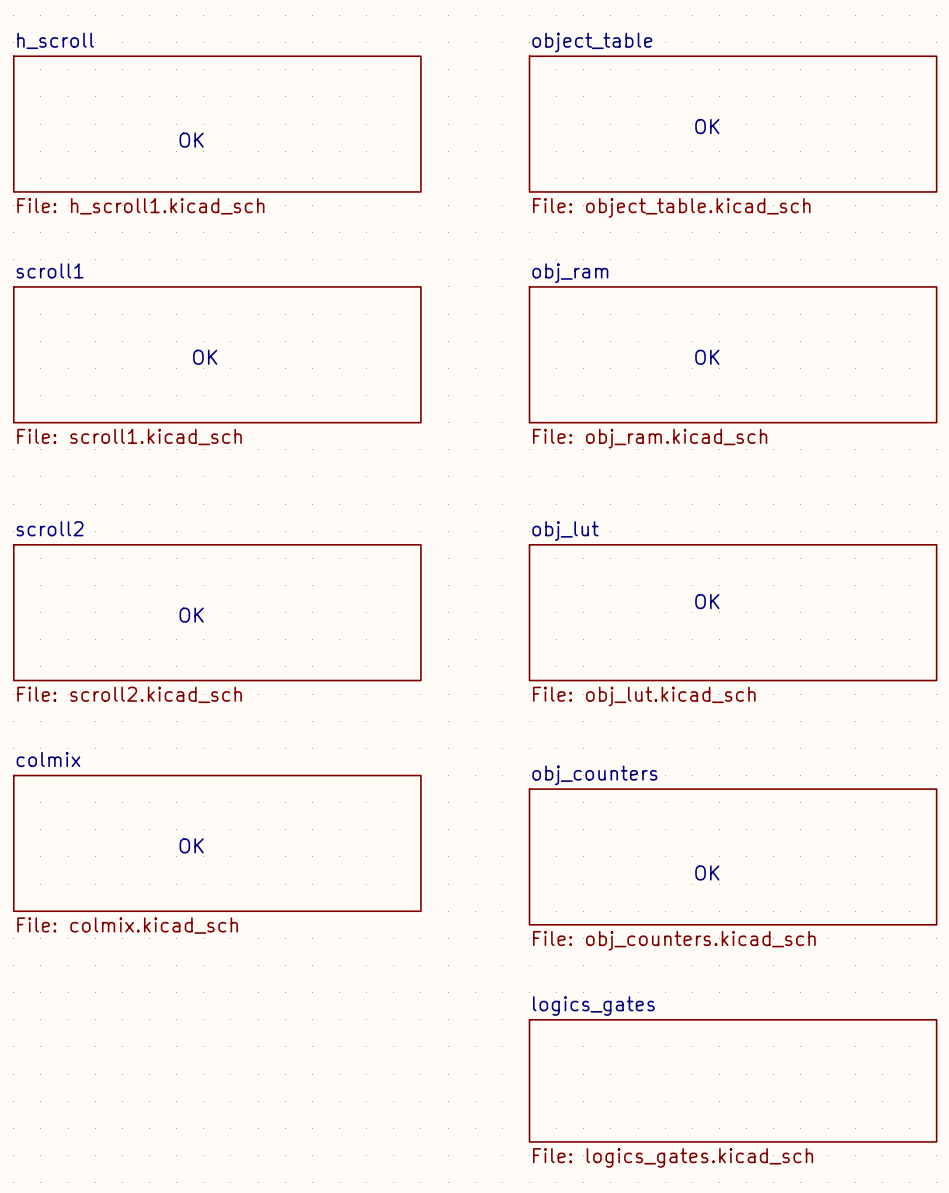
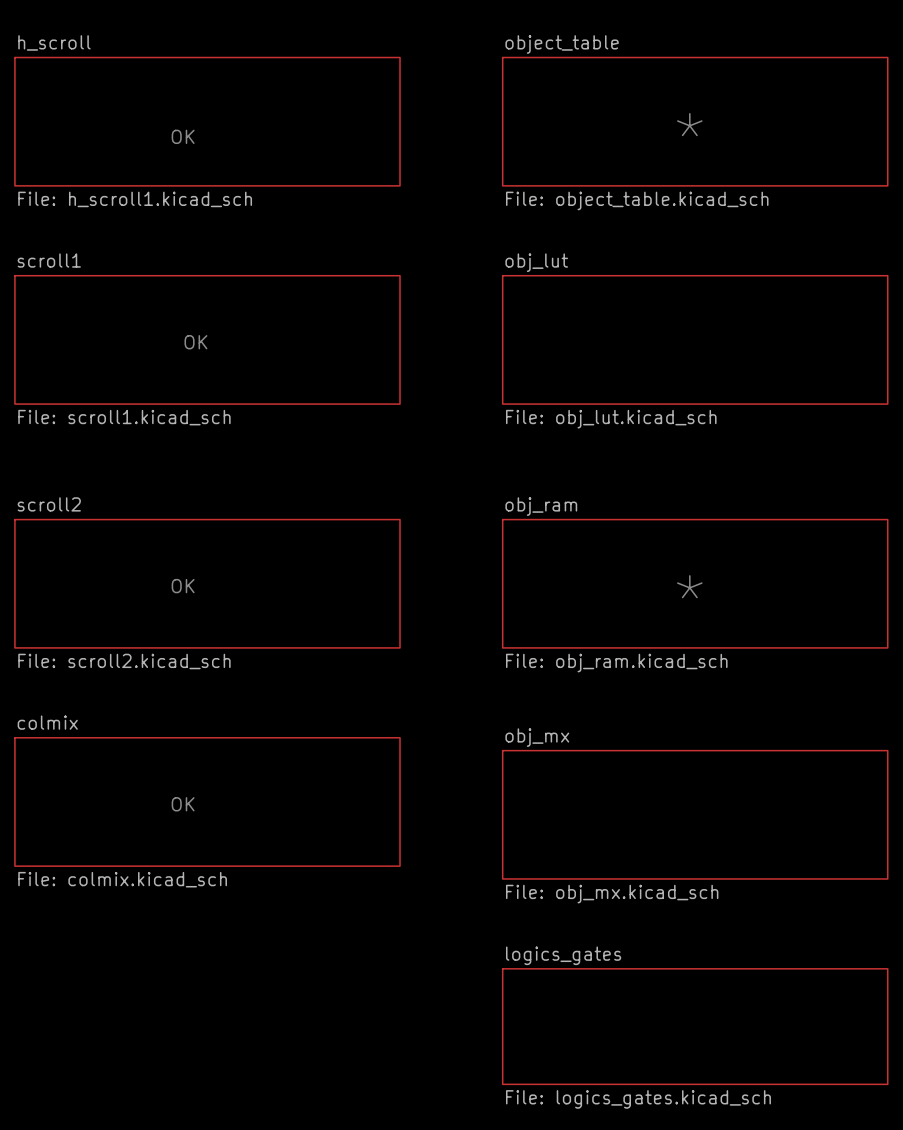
text: OK (707, 126) -> none
text: none -> * (689, 124)
sheet obj_ram name: obj_ram (570, 273) -> obj_lut (536, 262)
text: OK (707, 357) -> none
sheet obj_ram value: File: obj_ram.kicad_sch (650, 438) -> File: obj_lut.kicad_sch (611, 419)
sheet obj_lut name: obj_lut (565, 531) -> obj_ram (541, 506)
text: OK (707, 601) -> none
text: none -> * (689, 586)
sheet obj_lut value: File: obj_lut.kicad_sch (644, 696) -> File: obj_ram.kicad_sch (616, 663)
sheet obj_counters name: obj_counters (594, 775) -> obj_mx (537, 737)
text: OK (707, 872) -> none
sheet obj_counters value: File: obj_counters.kicad_sch (674, 940) -> File: obj_mx.kicad_sch (612, 894)

